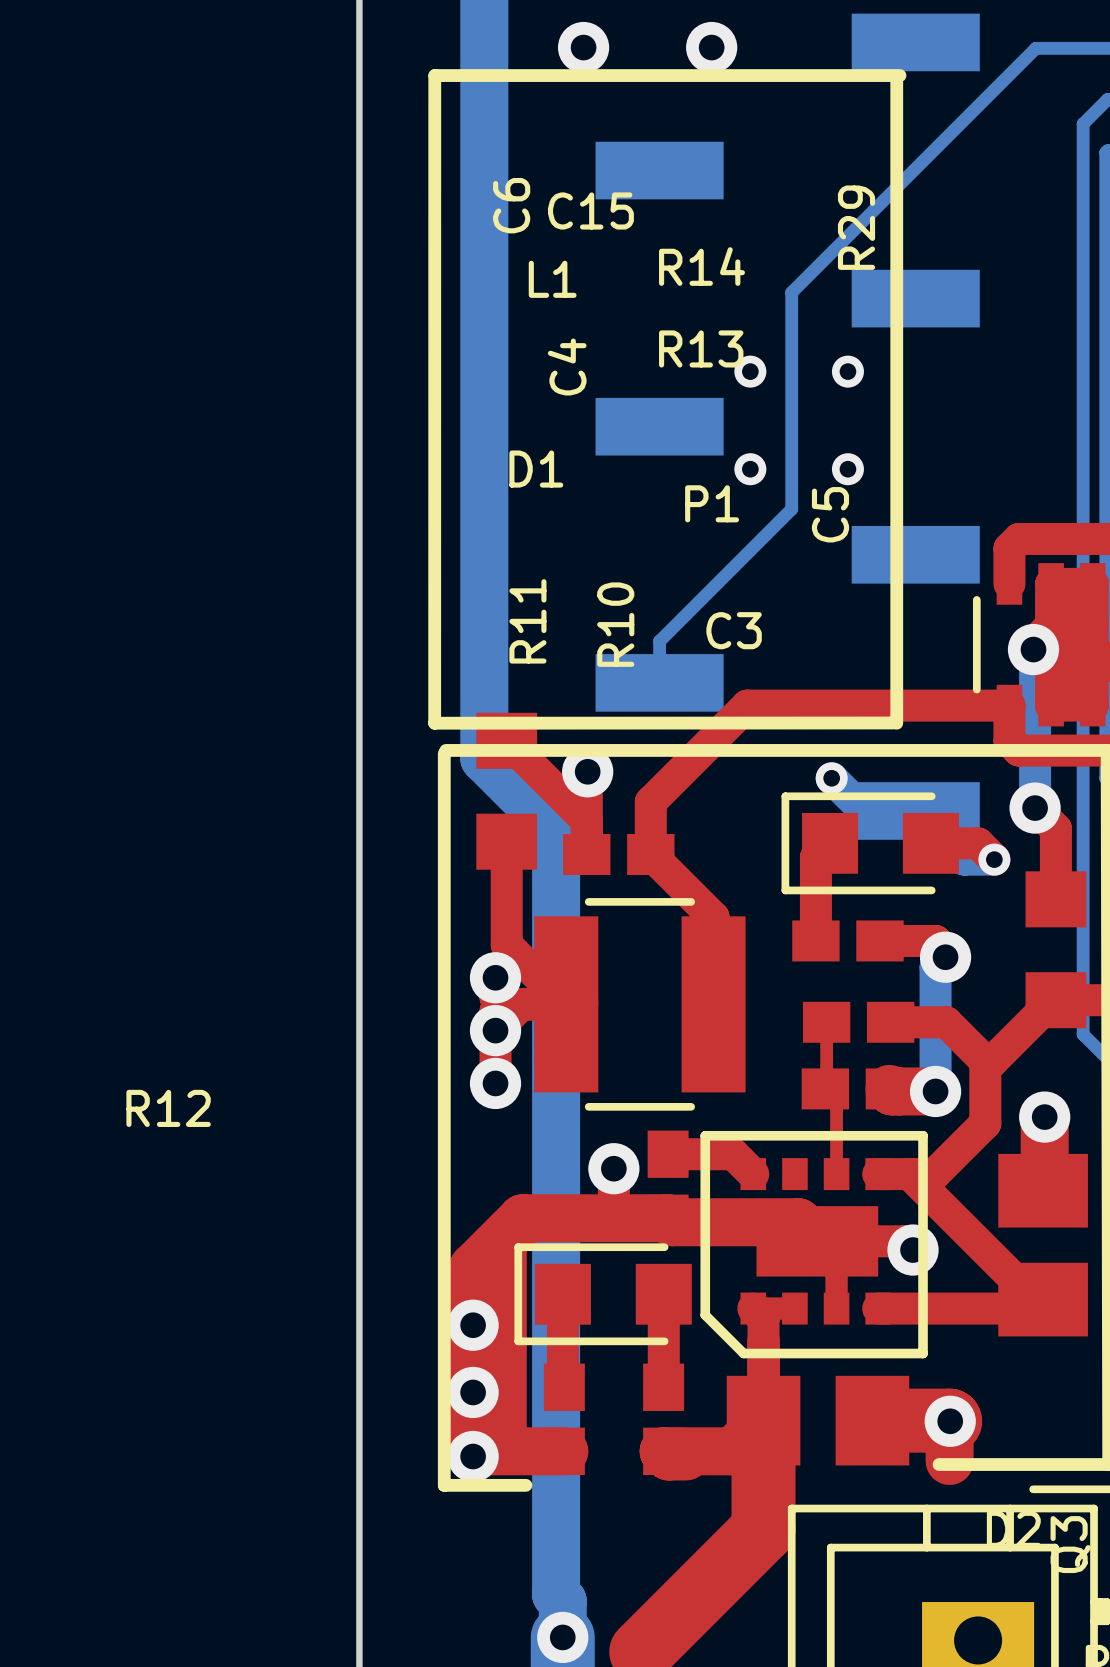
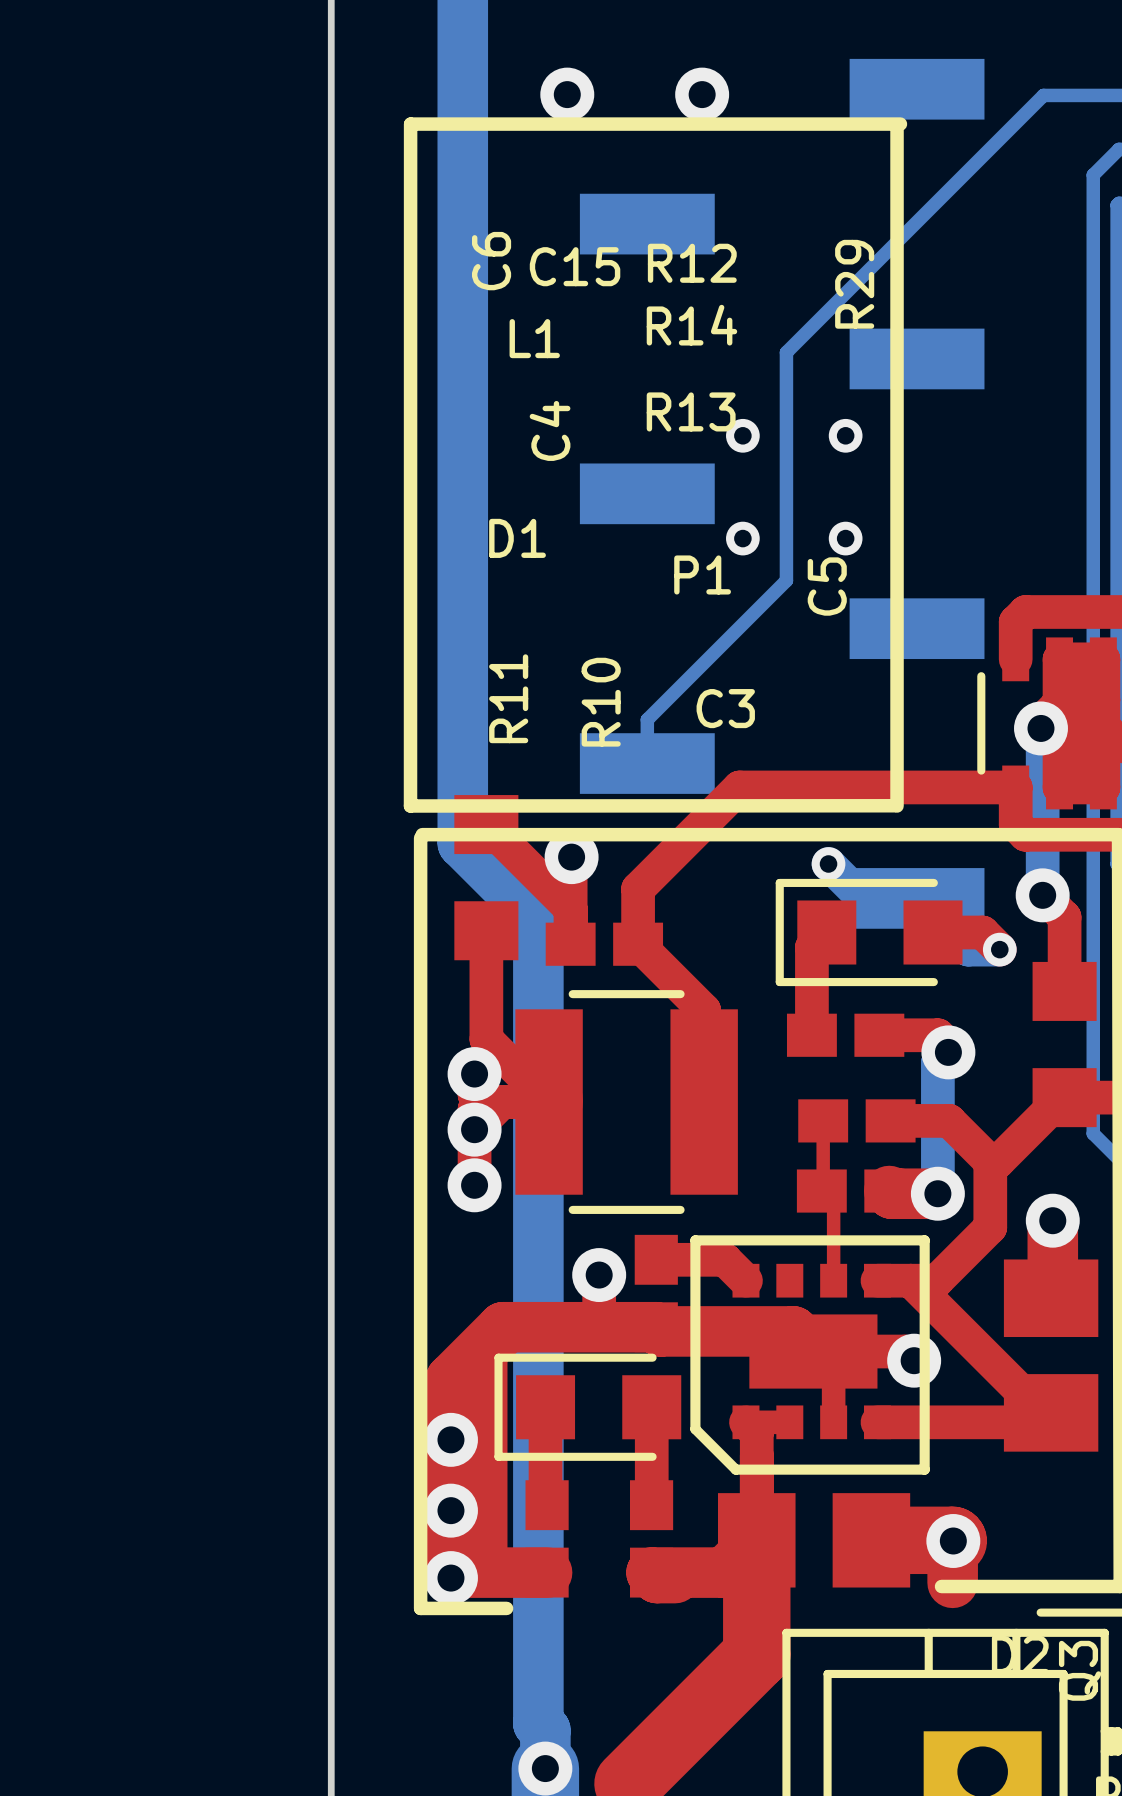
R12 name position: R12 (168, 1108) -> R12 (692, 263)

